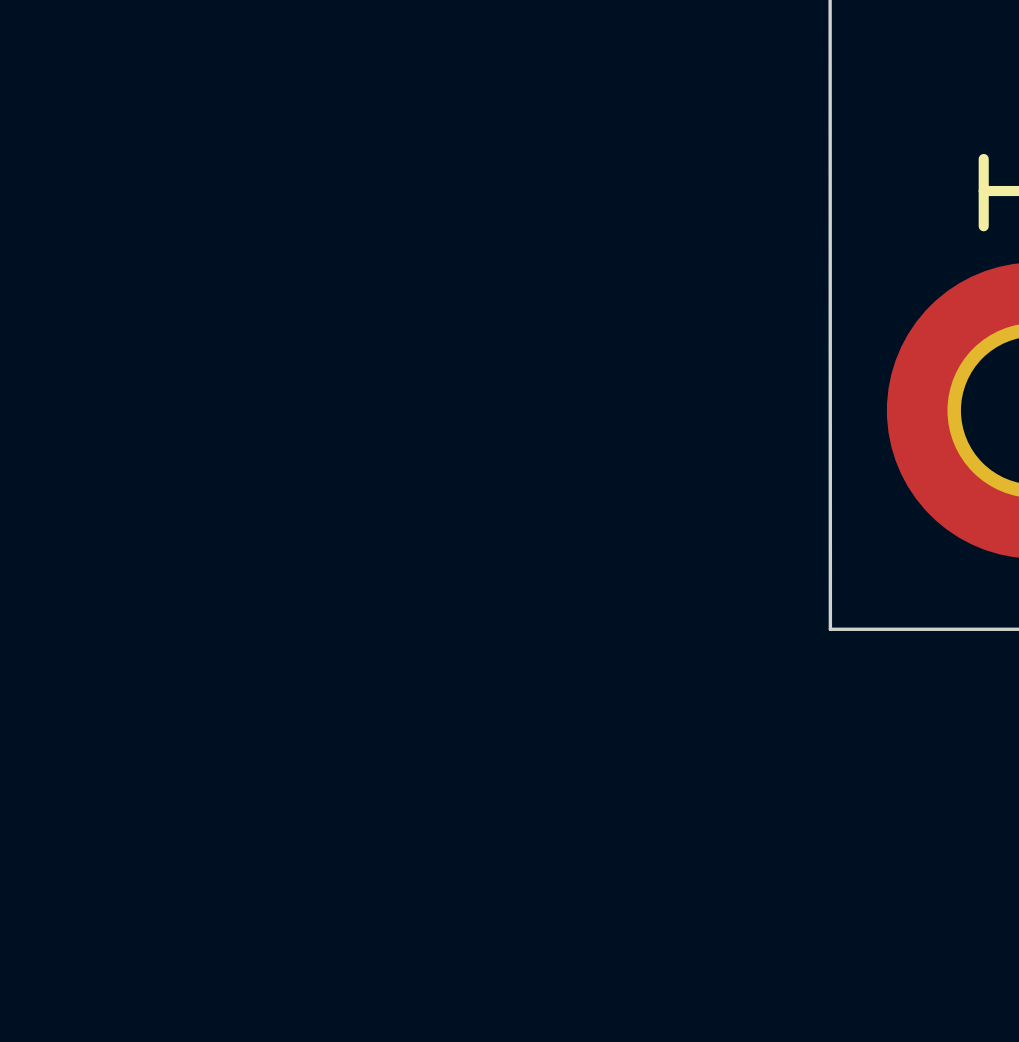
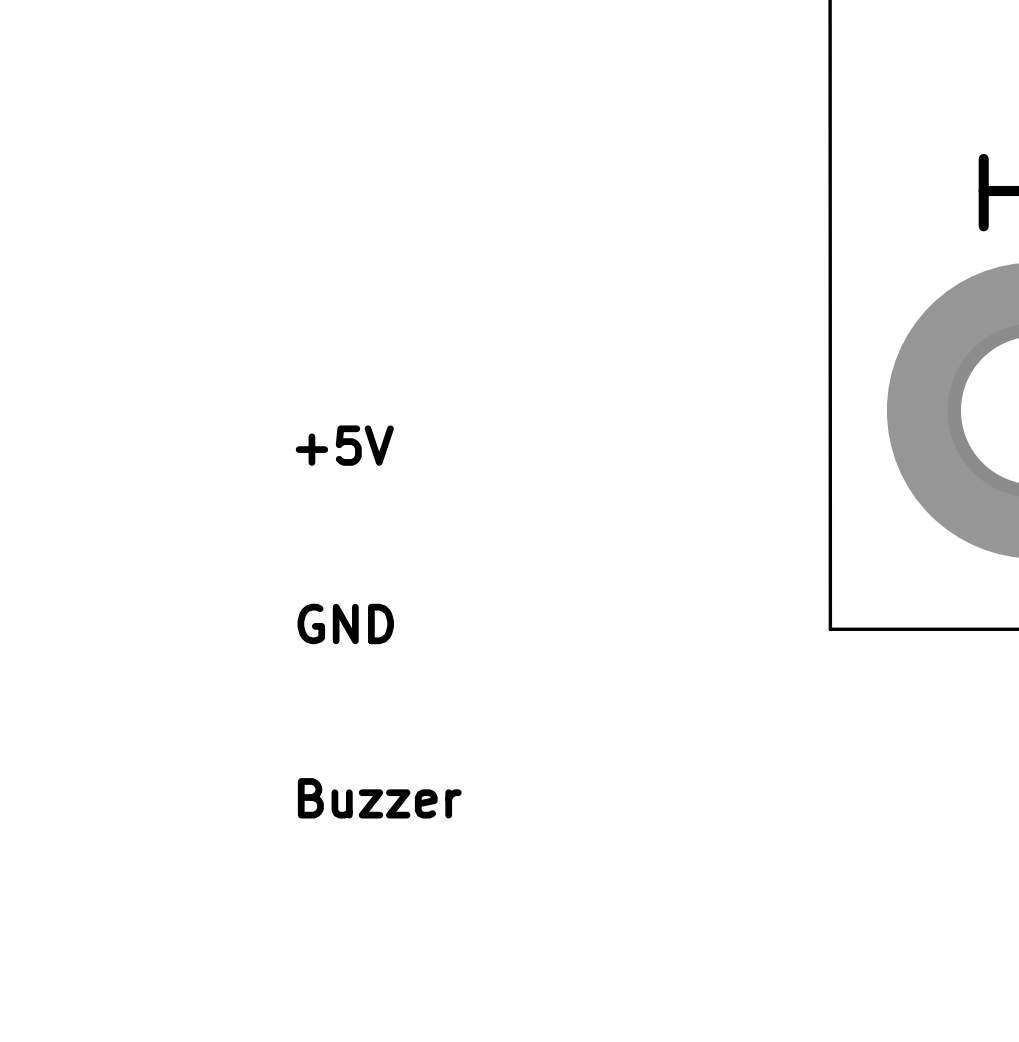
text: none -> +5V (344, 445)
text: none -> GND (345, 623)
text: none -> Buzzer (379, 798)

